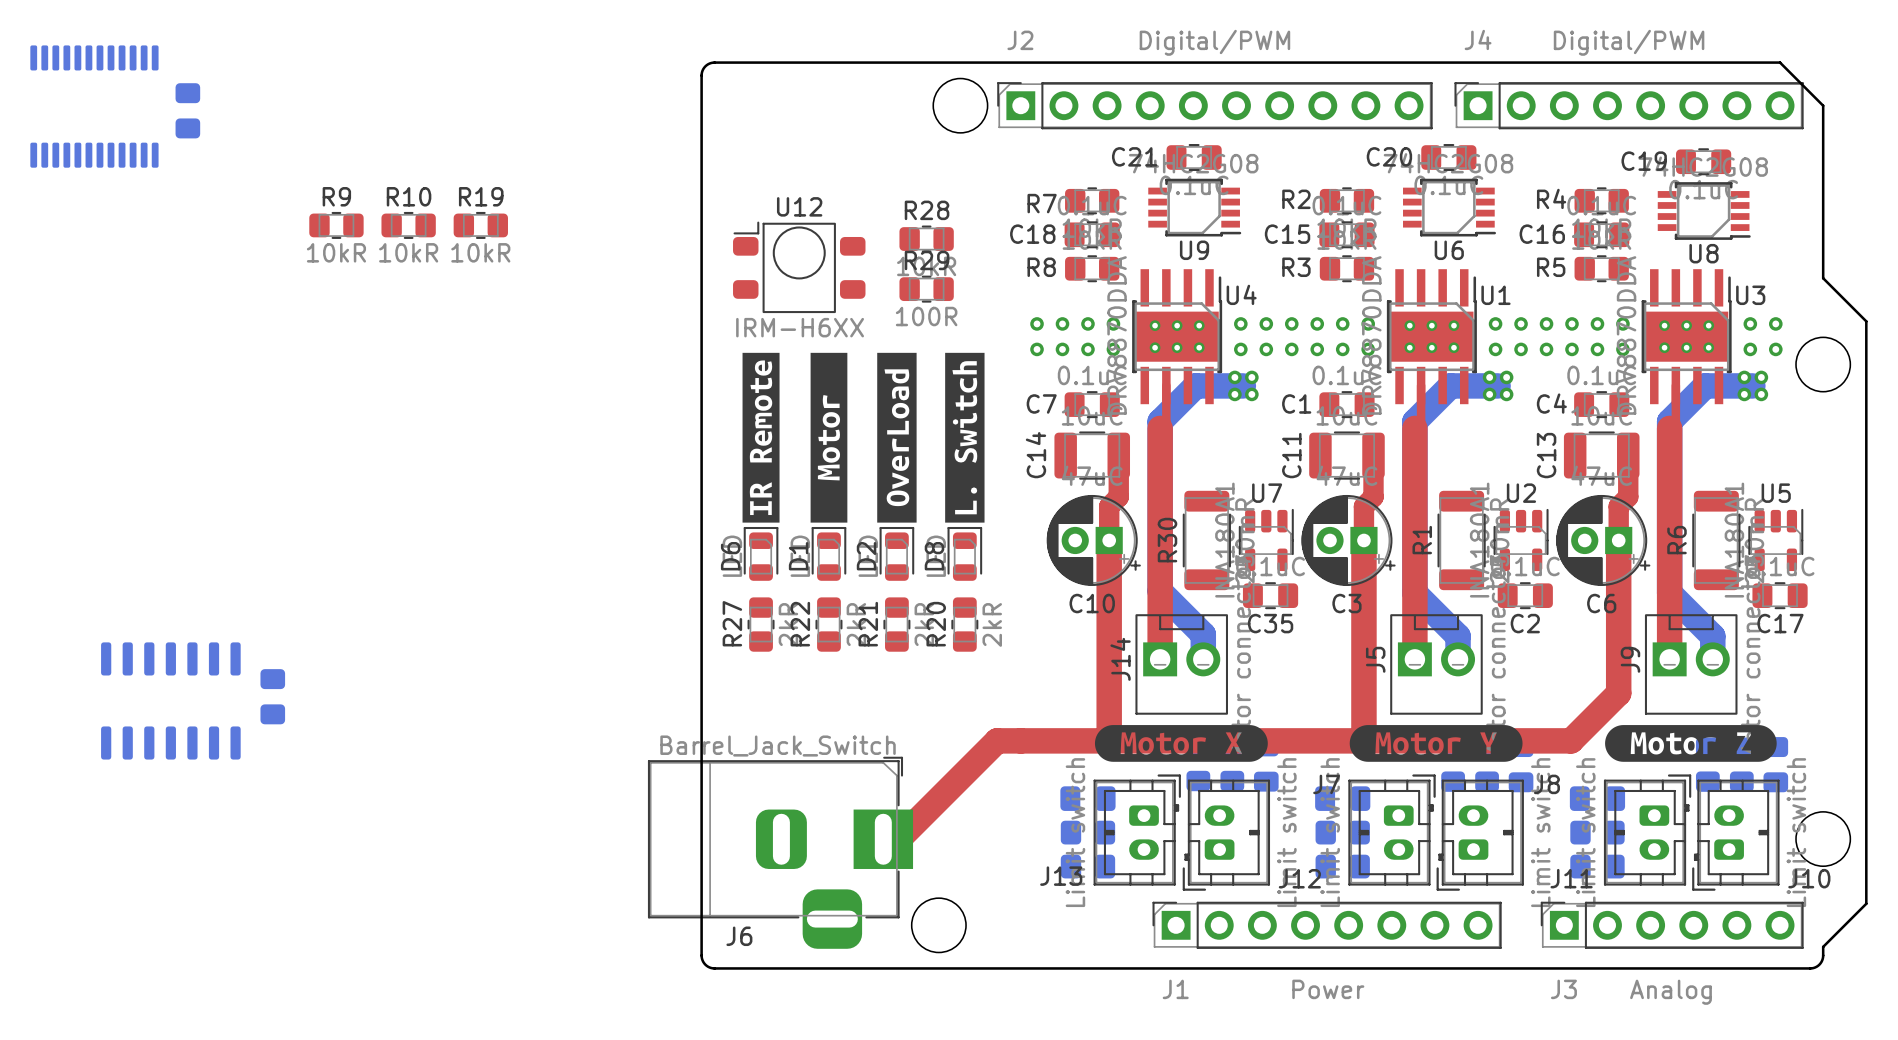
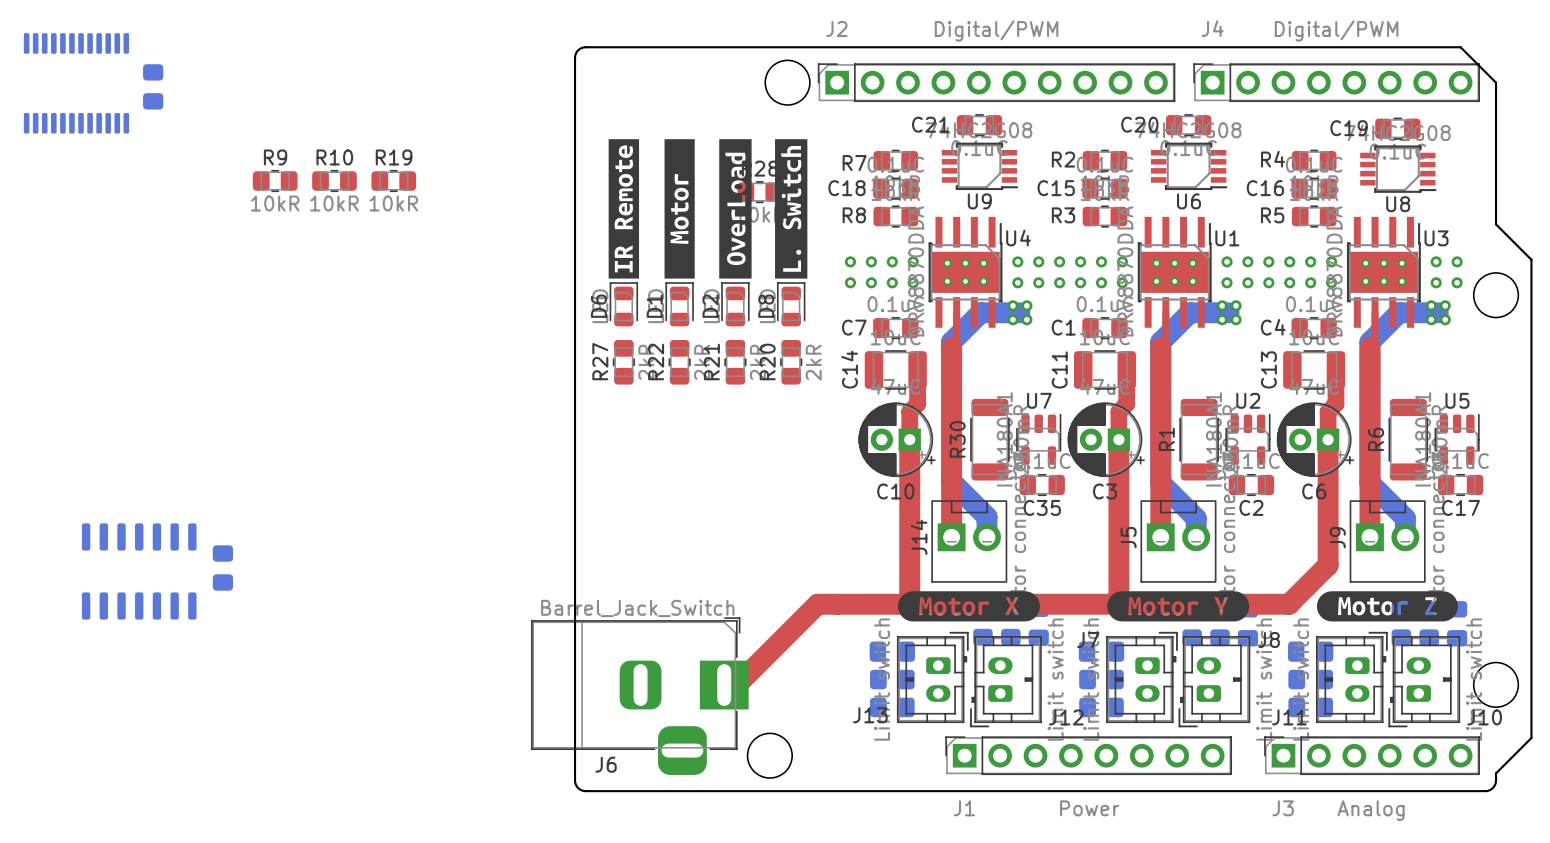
U12: IRM-H6XX (799, 267) -> none
R29: 100R (926, 289) -> none
drawing position: (761, 437) -> (623, 208)
drawing position: (828, 437) -> (679, 208)
drawing position: (896, 437) -> (735, 208)
drawing position: (964, 437) -> (791, 208)
D6 position: (761, 553) -> (623, 304)
D1 position: (828, 553) -> (679, 304)
D2 position: (896, 553) -> (735, 304)
D8 position: (964, 553) -> (791, 304)
R27 position: (761, 624) -> (623, 362)
R22 position: (828, 624) -> (679, 362)
R21 position: (896, 624) -> (735, 362)
R20 position: (964, 624) -> (791, 362)

